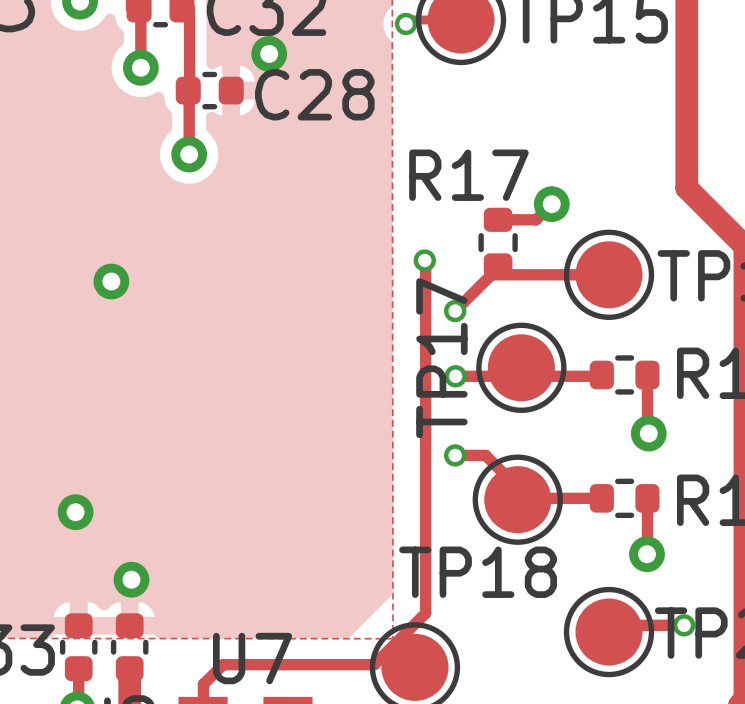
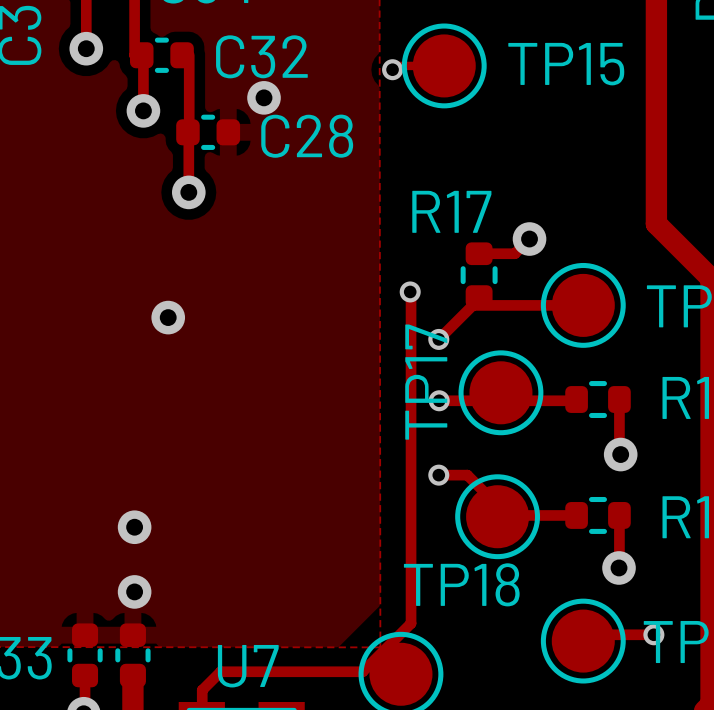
via position: (111, 281) -> (168, 317)
via position: (75, 512) -> (134, 527)

